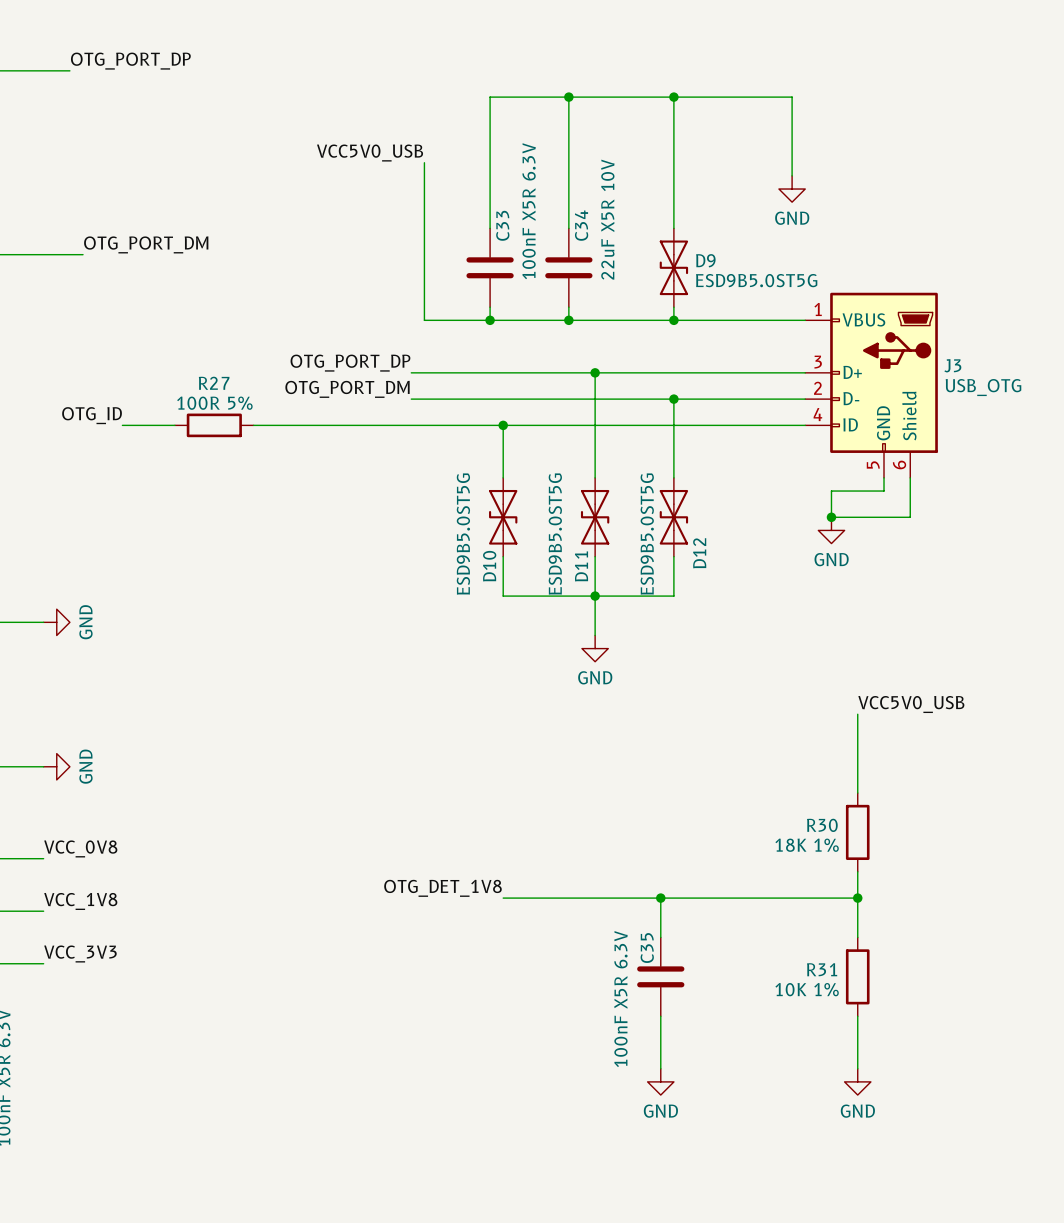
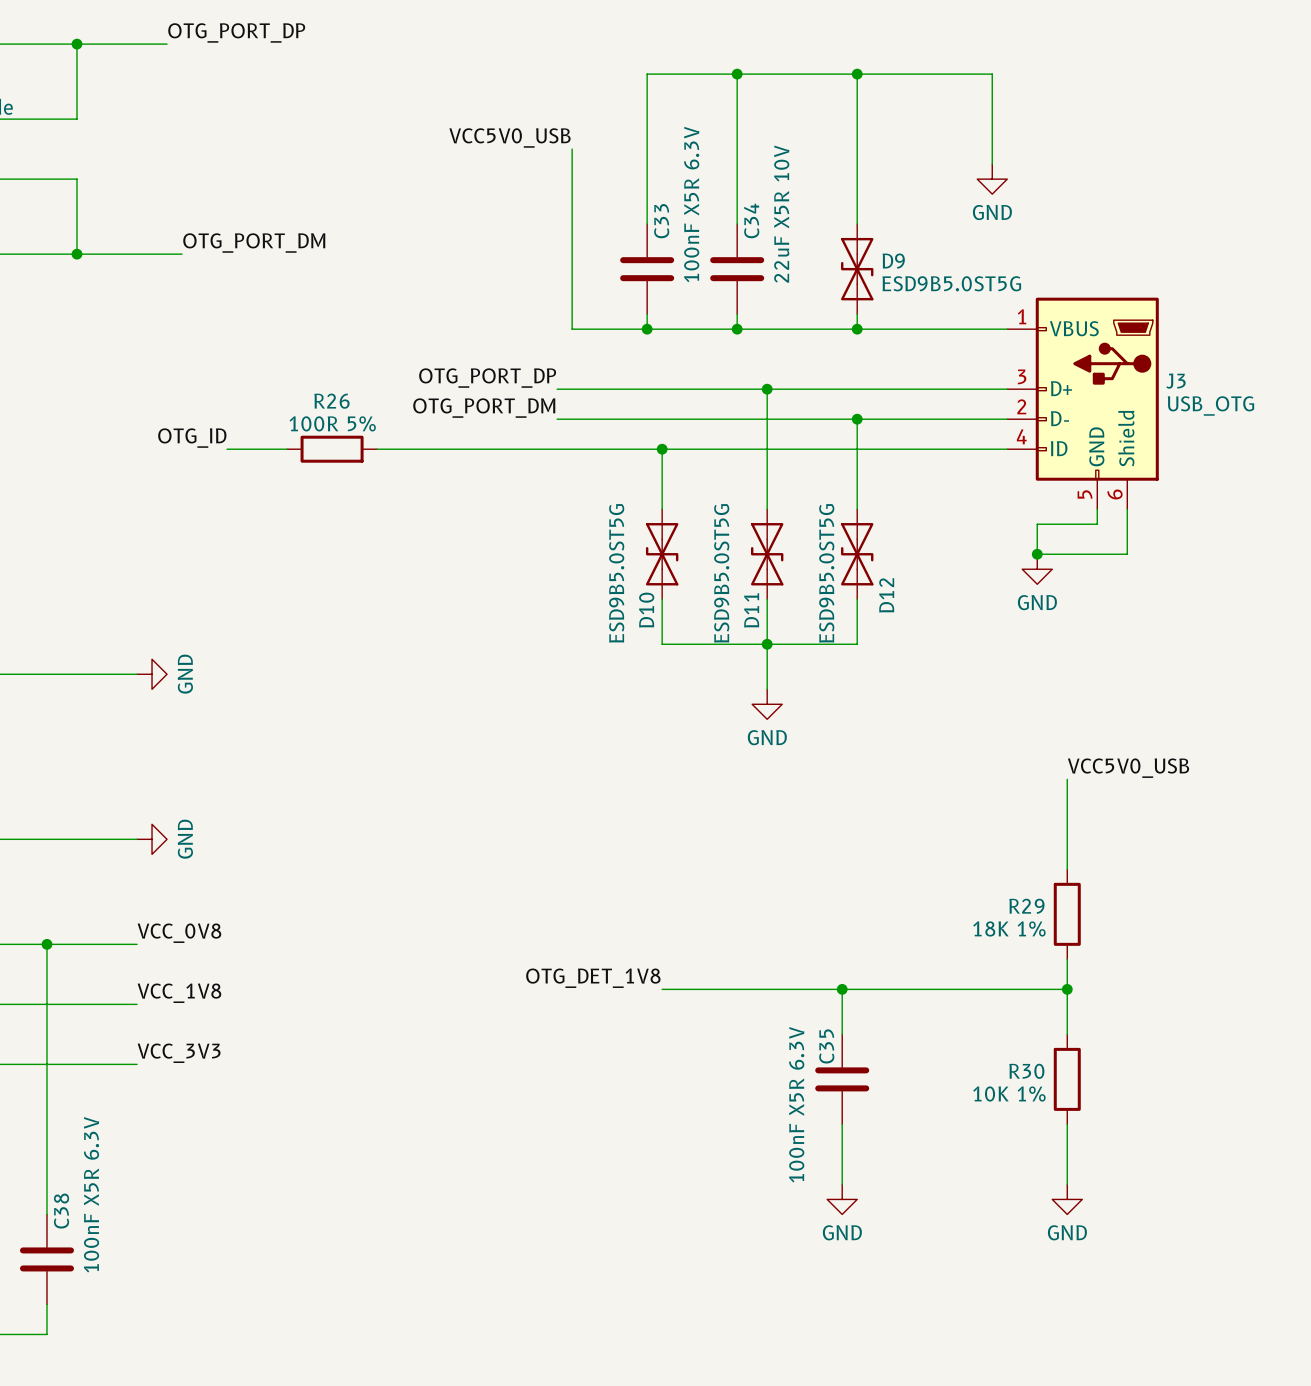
R27 name: R27 (214, 383) -> R26 (331, 401)
R30 name: R30 (822, 825) -> R29 (1026, 906)
R31 name: R31 (822, 969) -> R30 (1026, 1071)

